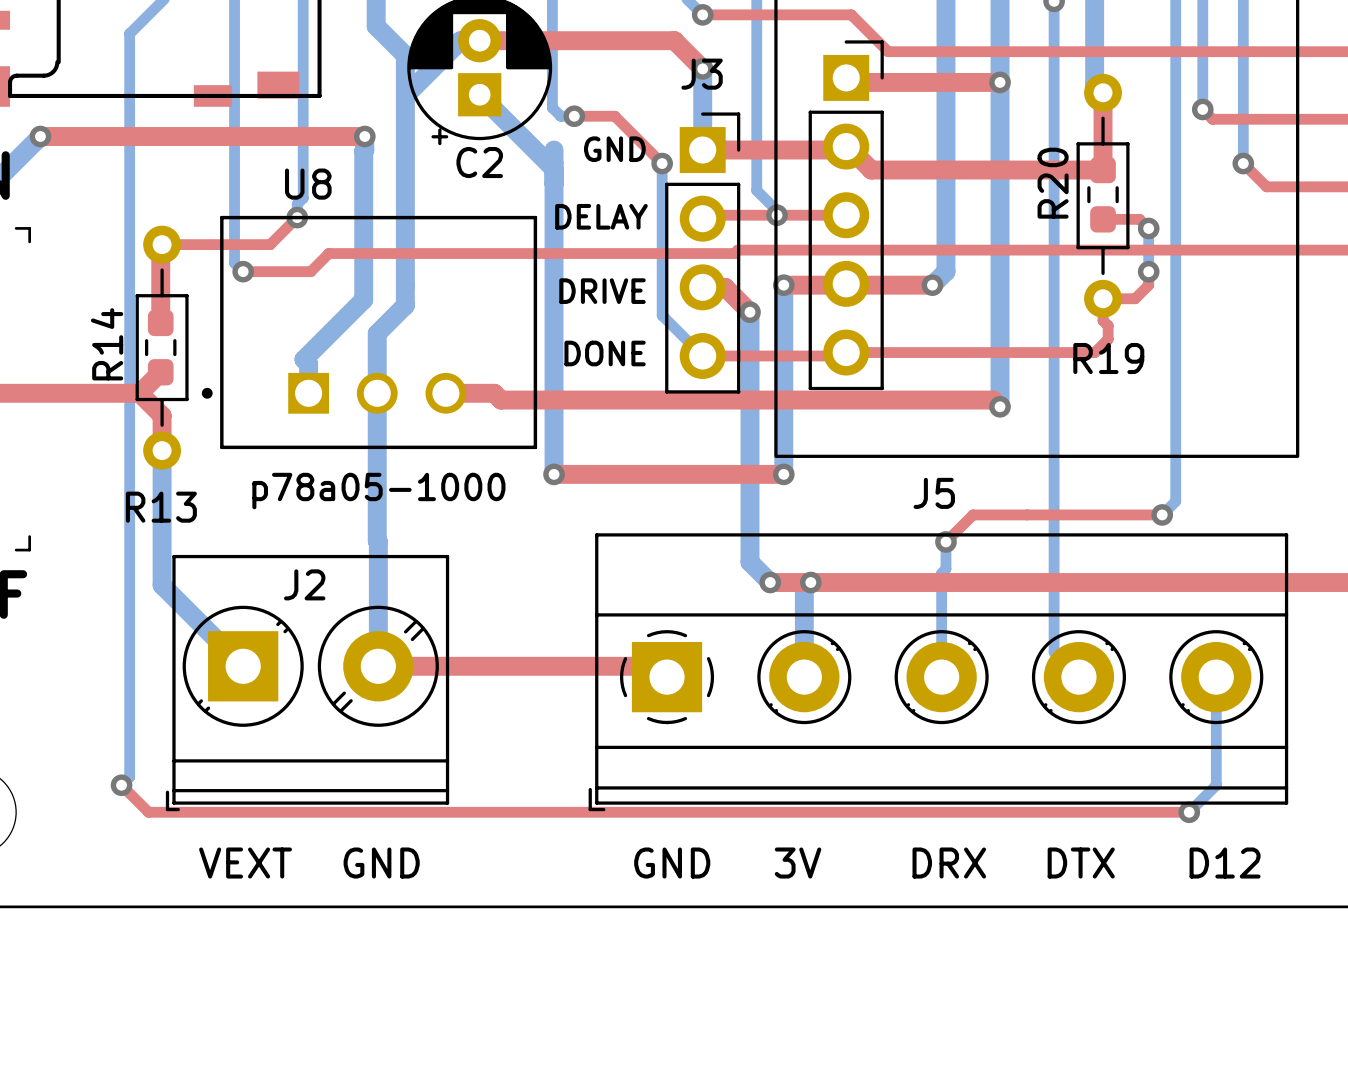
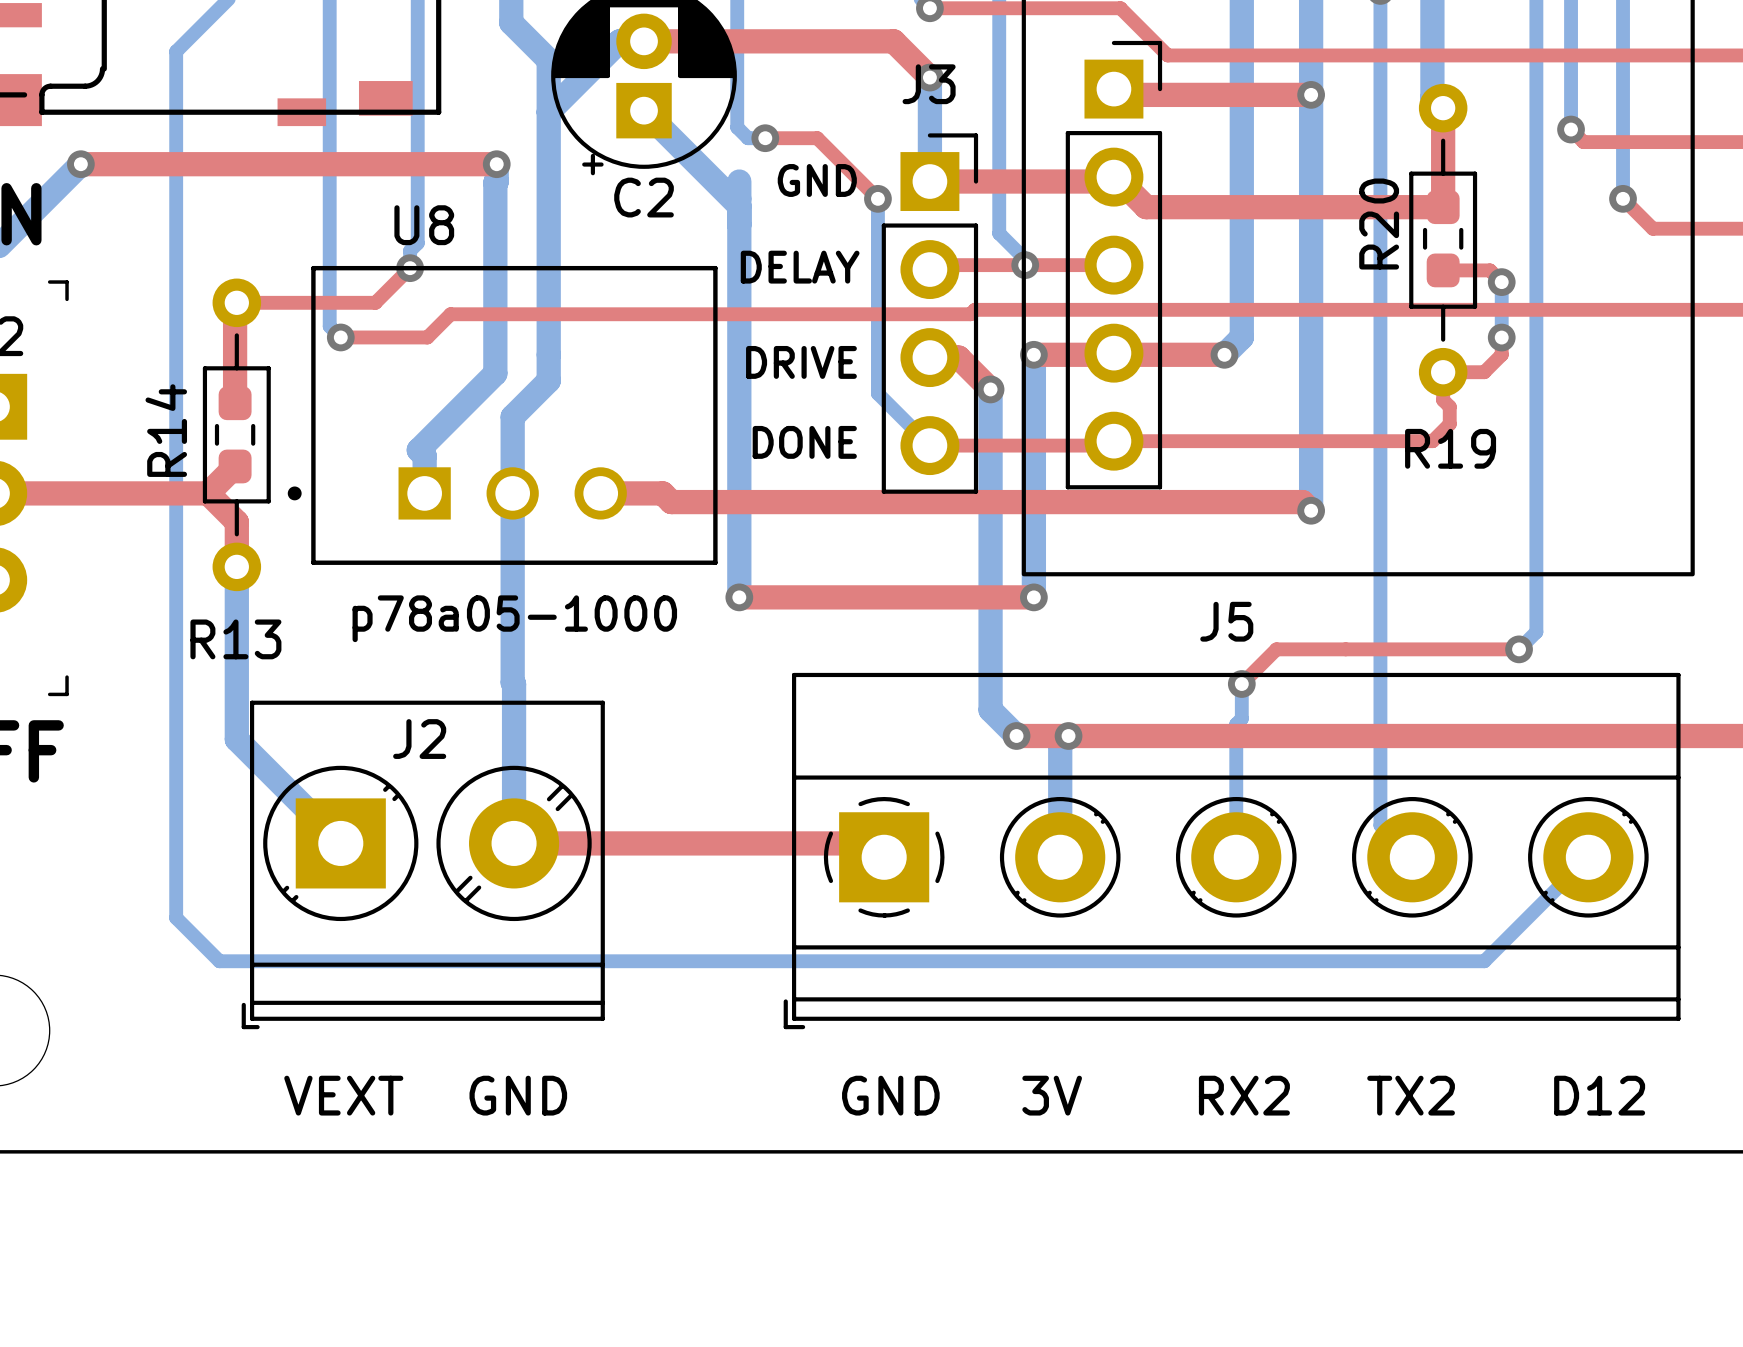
bottom track: (129, 33) (129, 777) (121, 785) -> (195, 32) (176, 51) (176, 917) (219, 961) (1484, 961) (1588, 857)
bottom track: (1216, 677) (1216, 785) (1189, 812) -> none
top track: (121, 785) (148, 812) (1189, 812) -> none
via: (121, 785) -> none
via: (1189, 812) -> none
text: DRX (949, 863) -> RX2 (1244, 1095)
text: DTX (1081, 863) -> TX2 (1411, 1095)

